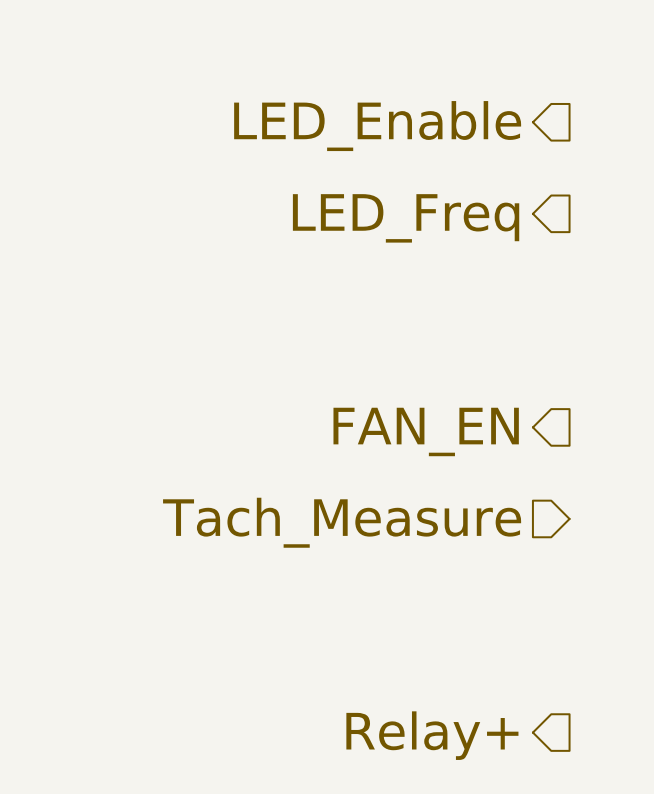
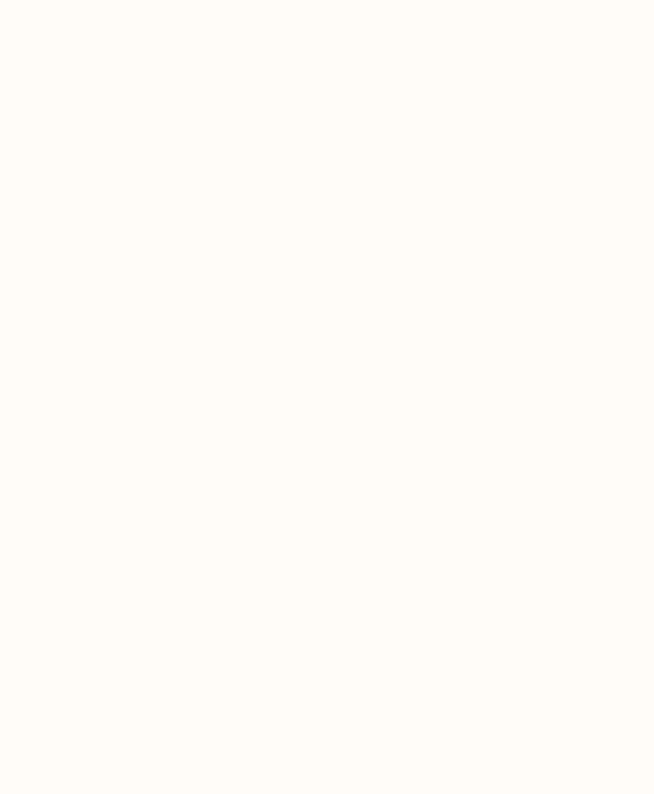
hierarchical label: LED_Enable (377, 126) -> none
hierarchical label: LED_Freq (406, 218) -> none
hierarchical label: FAN_EN (426, 431) -> none
hierarchical label: Tach_Measure (342, 522) -> none
hierarchical label: Relay+ (432, 735) -> none

